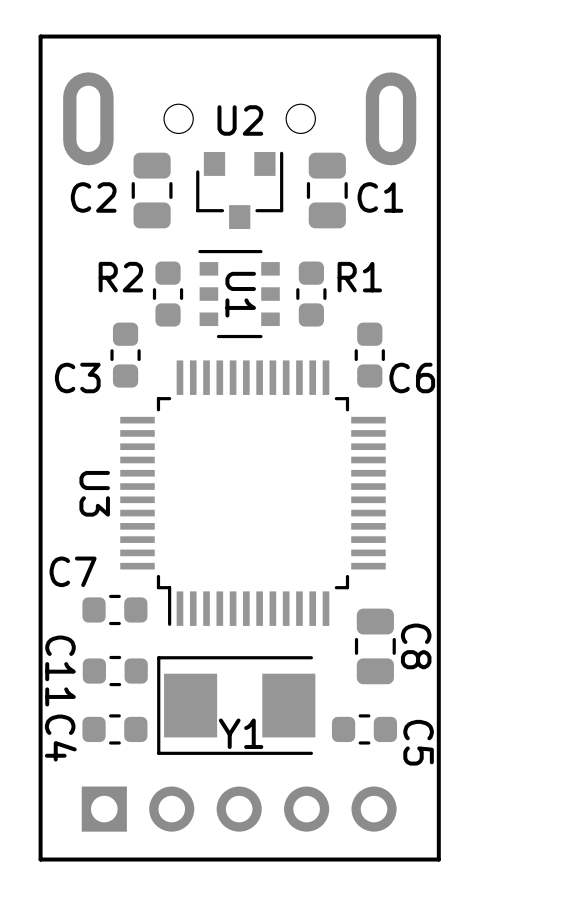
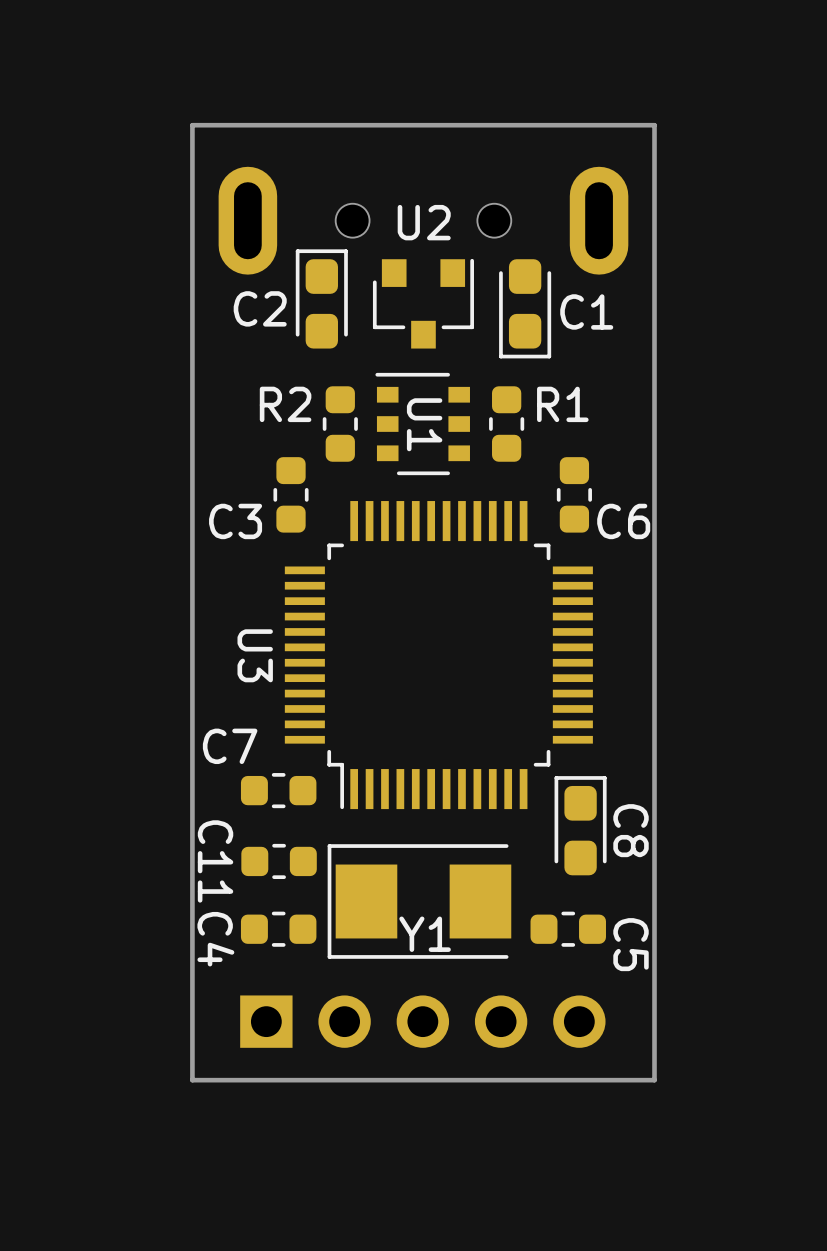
C2 footprint: [131, 152, 173, 229] -> [295, 249, 348, 349]
C1 footprint: [306, 152, 348, 229] -> [499, 259, 552, 359]
C8 footprint: [354, 608, 396, 685] -> [554, 776, 607, 876]

